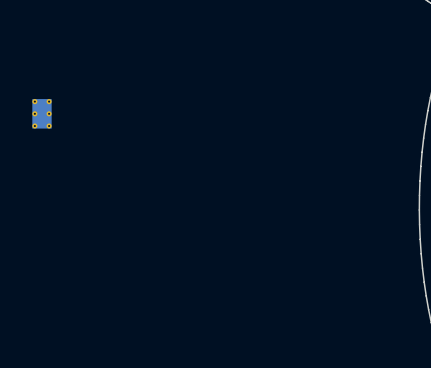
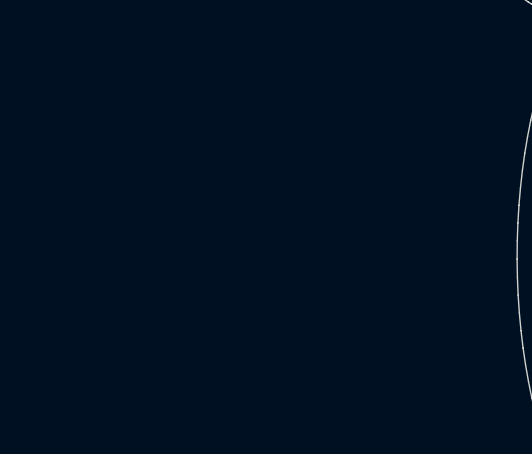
part: (41, 113) -> none

